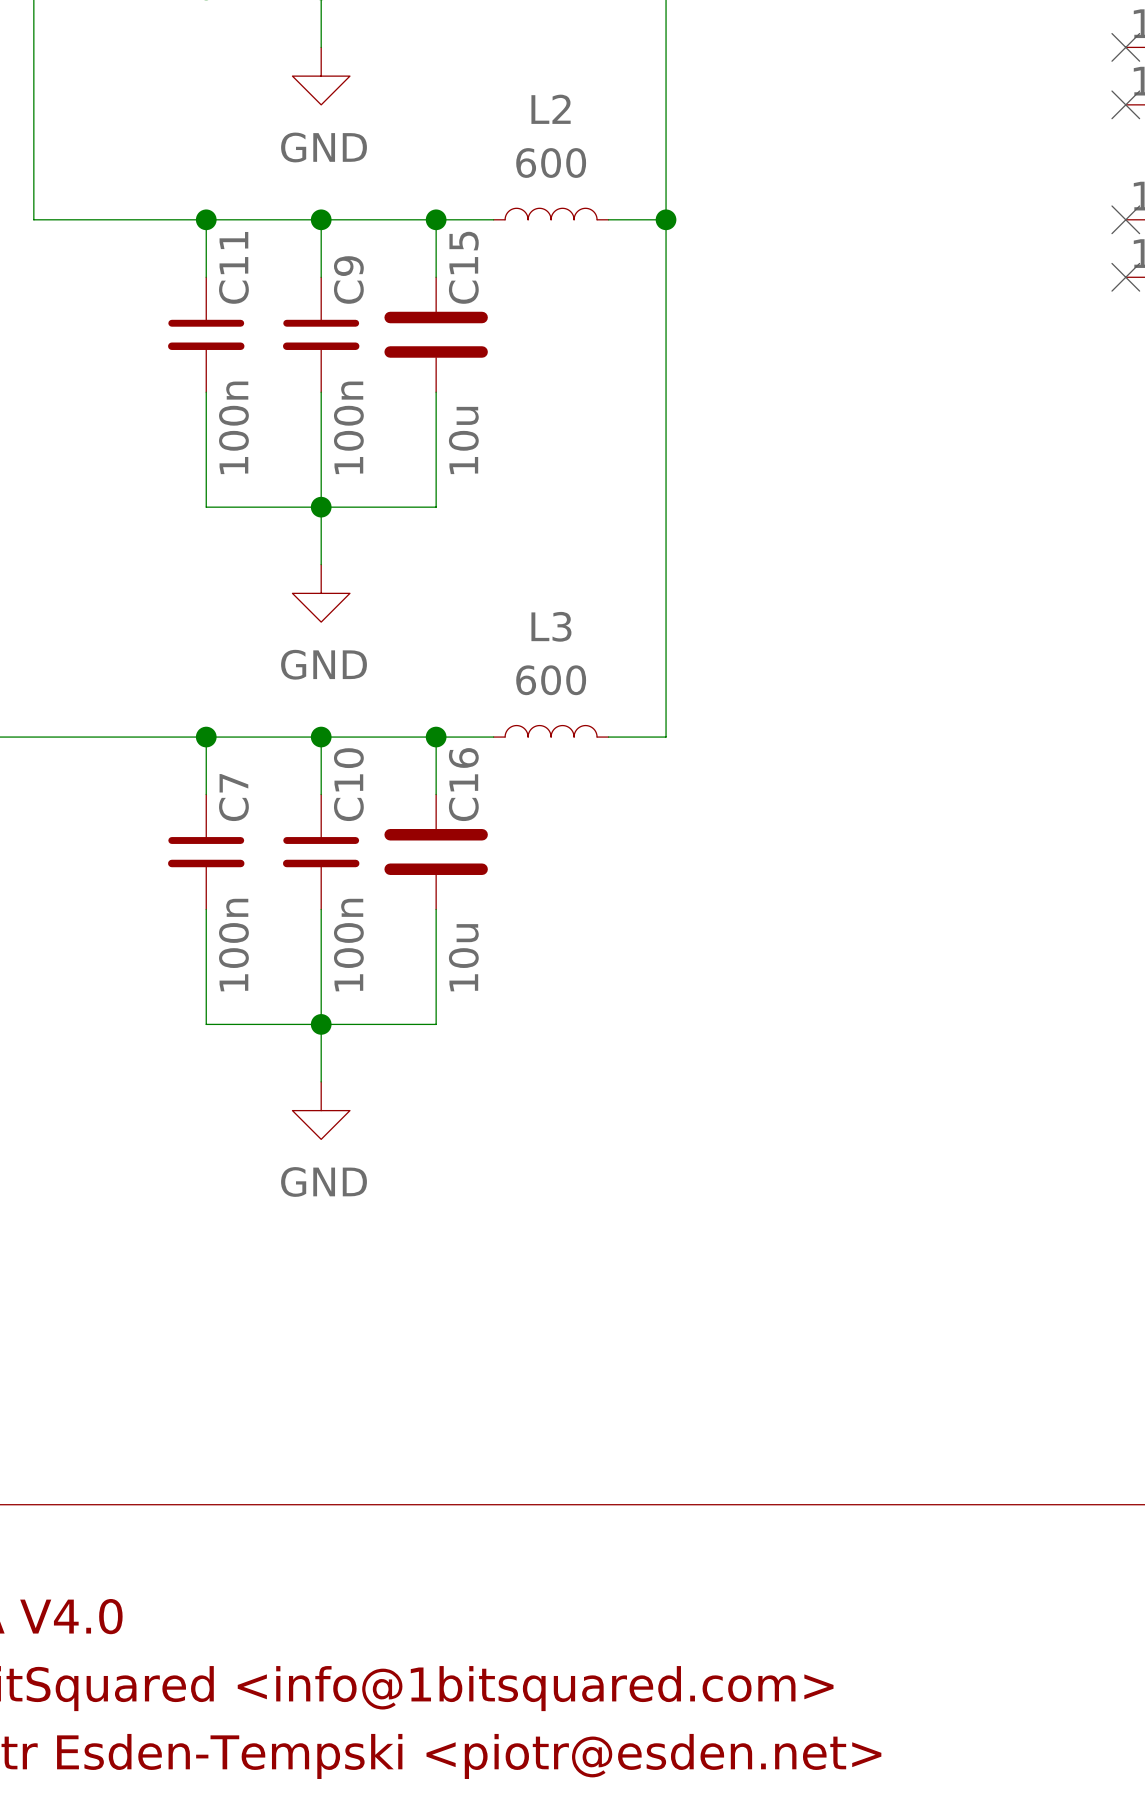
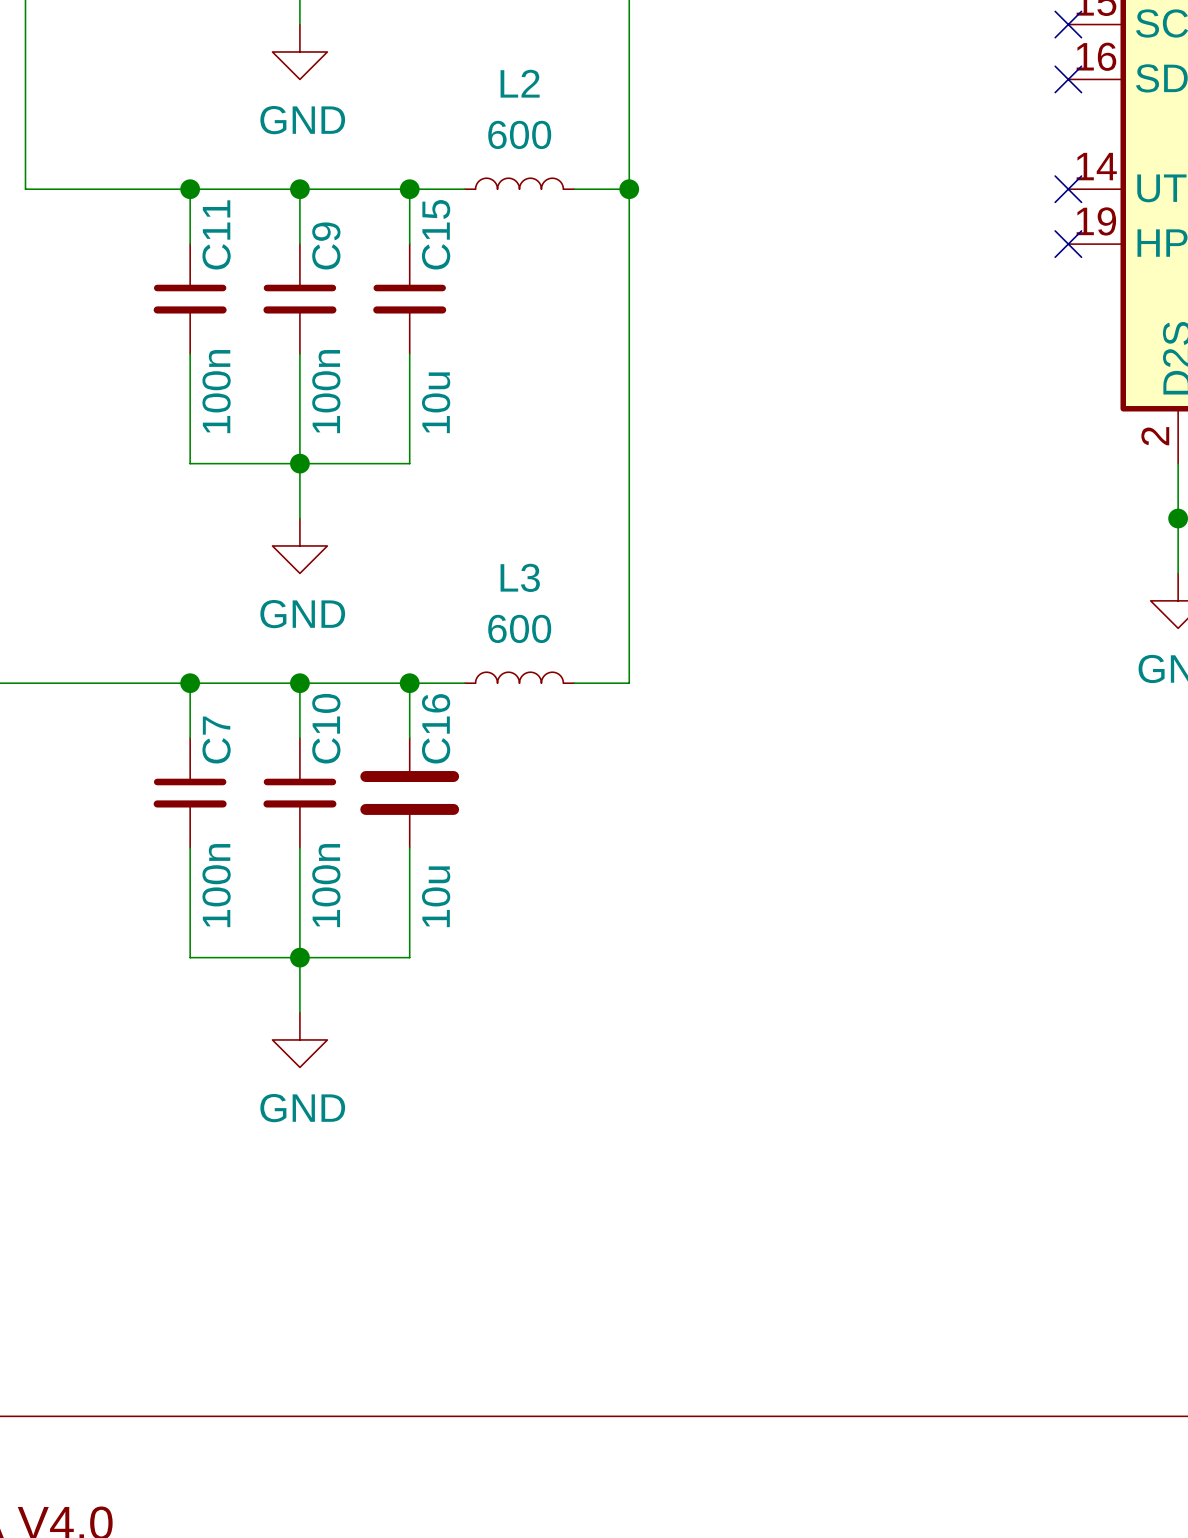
C15 symbol: [384, 277, 488, 393] -> [373, 244, 447, 354]

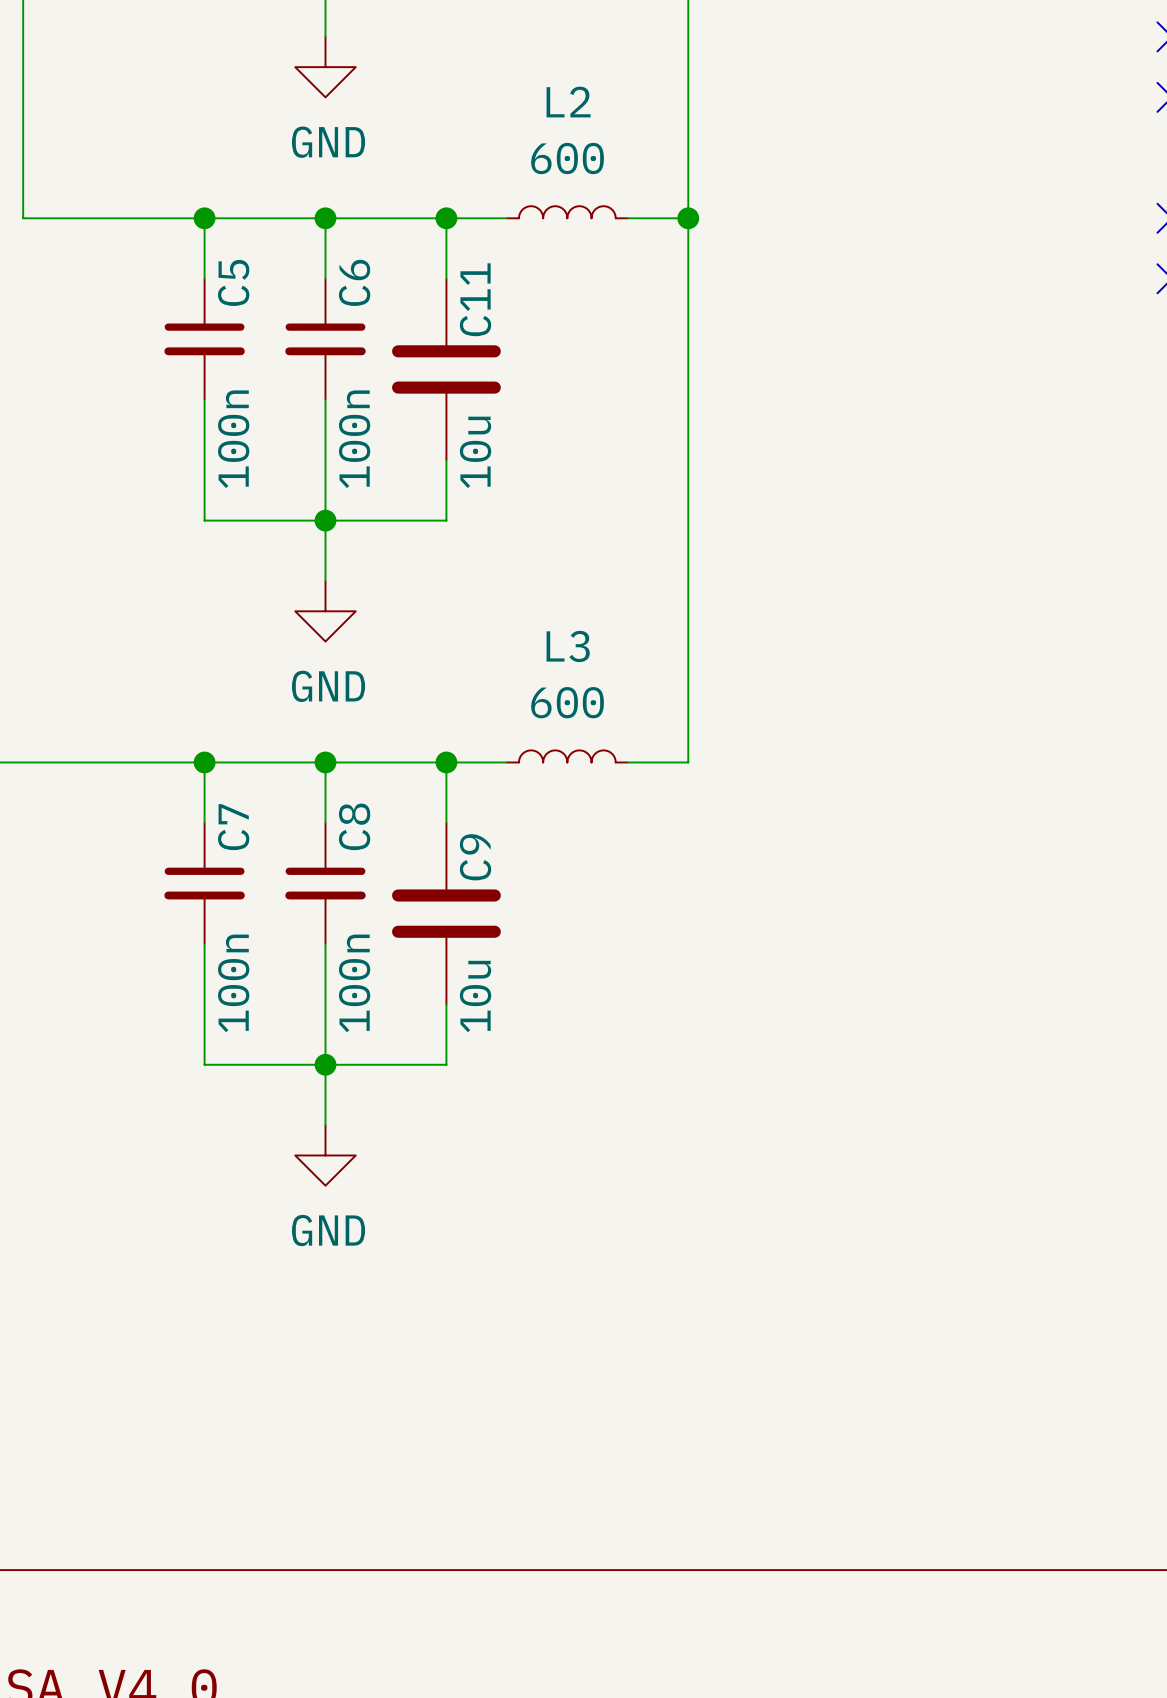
C11 name: C11 (216, 234) -> C5 (233, 282)
C9 symbol: [263, 244, 337, 354] -> [392, 822, 501, 1005]
C6: none -> 100n (325, 339)
C15: 10u (409, 298) -> none
C11: none -> 10u (446, 369)
C10 name: C10 (326, 728) -> C8 (354, 826)
C16: 10u (409, 792) -> none

